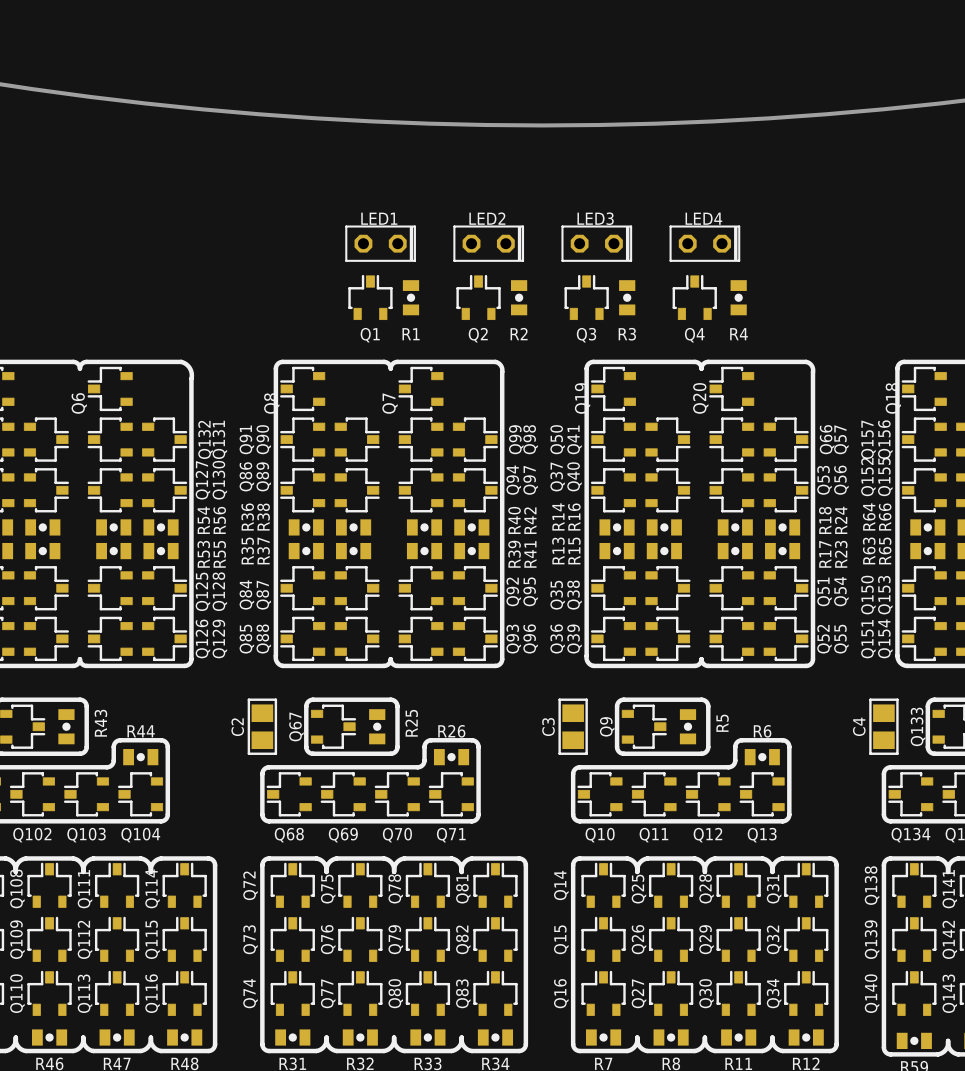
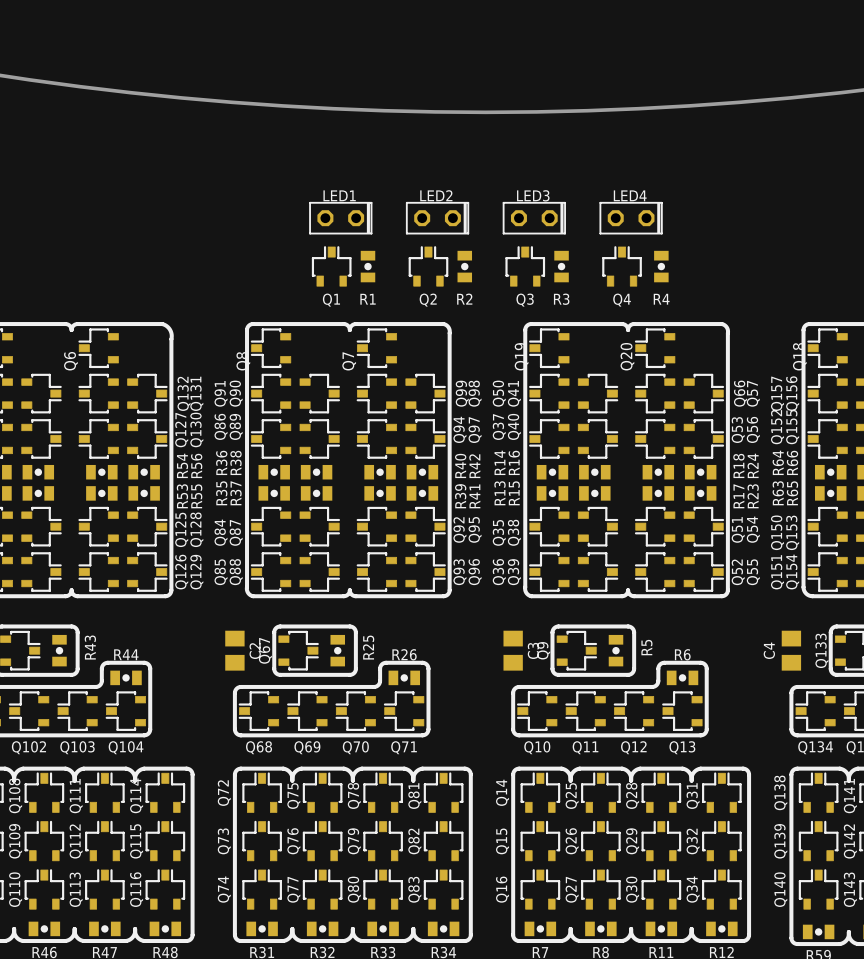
line: (248, 699) (275, 699) (275, 753) (248, 753) (248, 699) -> none
line: (559, 699) (586, 699) (586, 753) (559, 753) (559, 699) -> none
line: (870, 699) (897, 699) (897, 753) (870, 753) (870, 699) -> none
C2 name position: C2 (237, 727) -> C2 (255, 651)
C3 name position: C3 (548, 727) -> C3 (533, 650)

